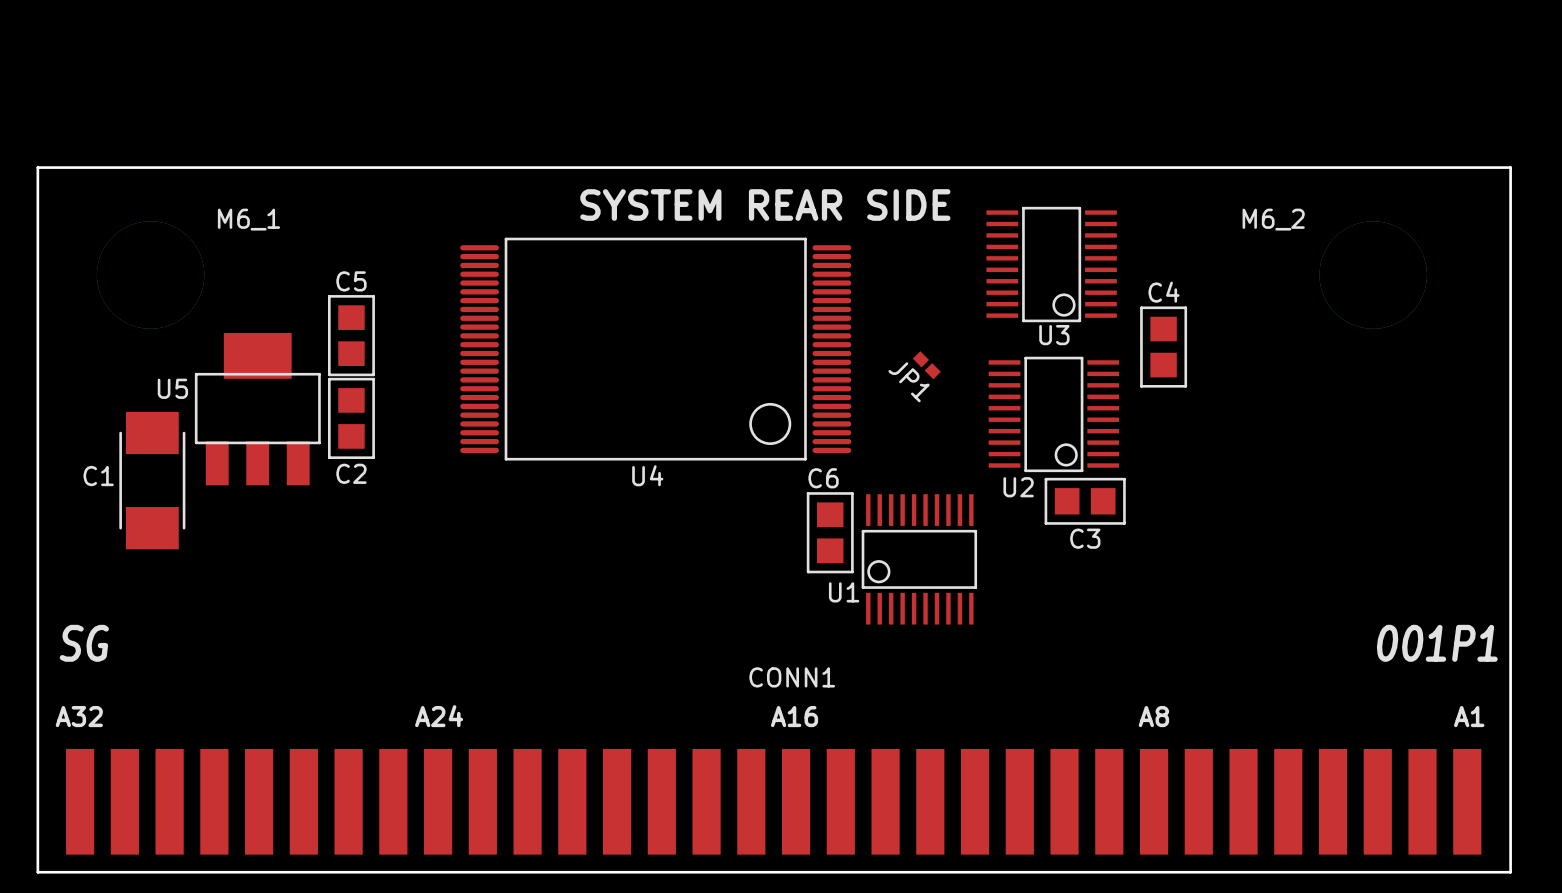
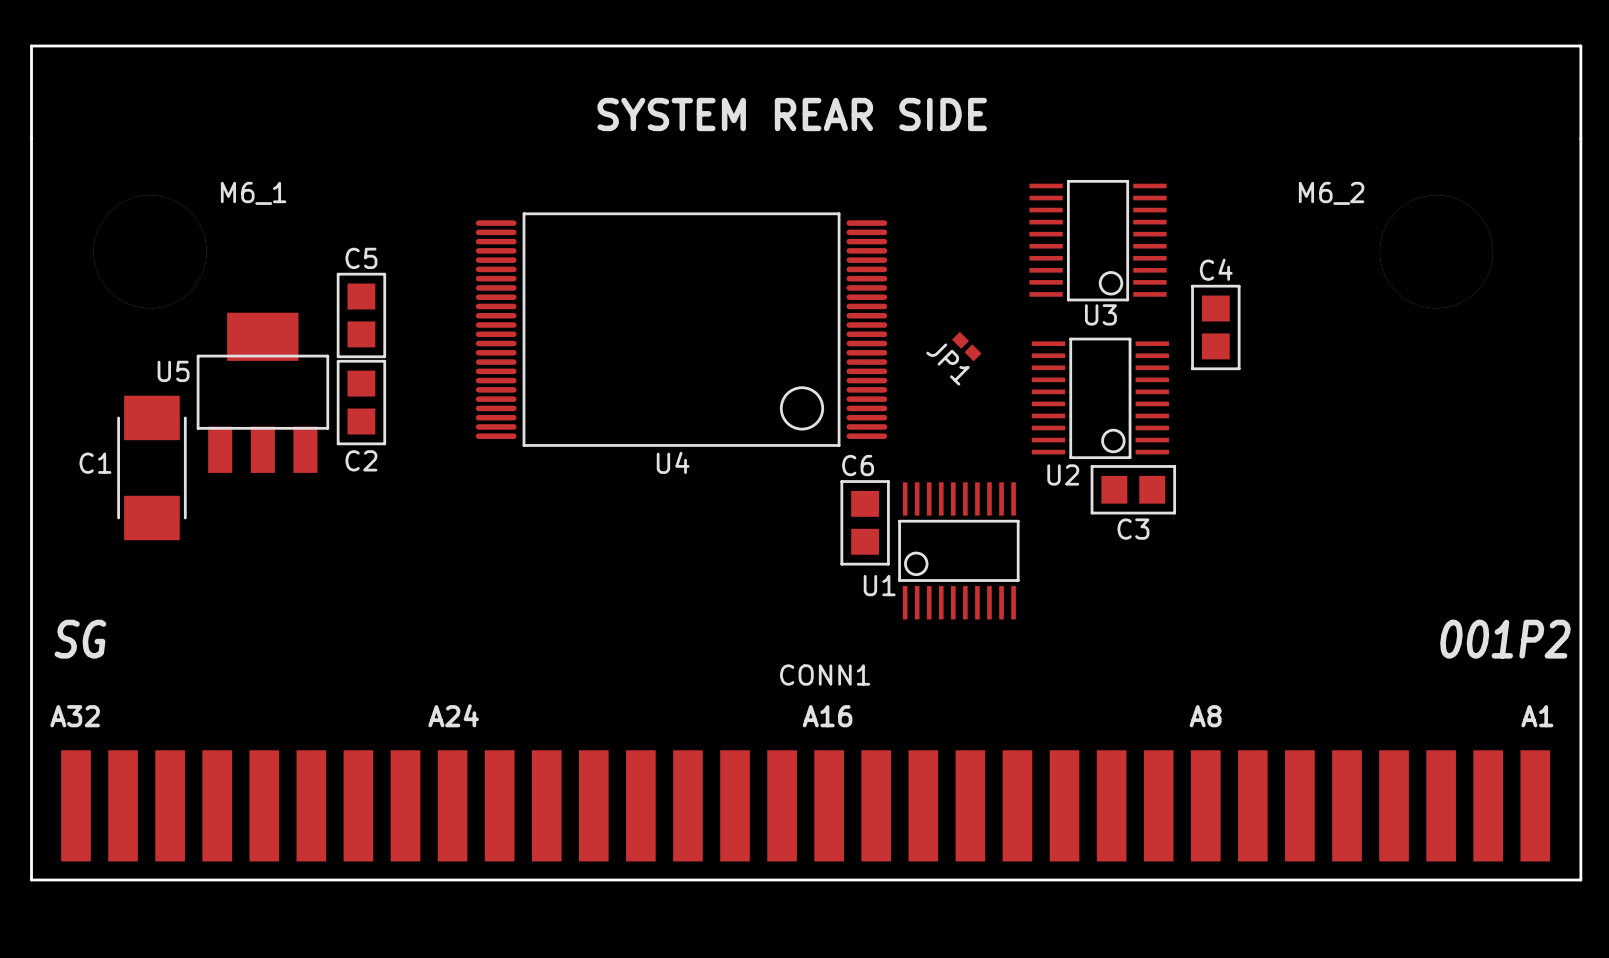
board edge: (37, 167) (1510, 167) -> (31, 138) (31, 46) (1580, 46) (1580, 138)
text position: SYSTEM REAR SIDE (765, 204) -> SYSTEM REAR SIDE (792, 114)
text: 001P1 (1437, 643) -> 001P2 (1505, 639)

